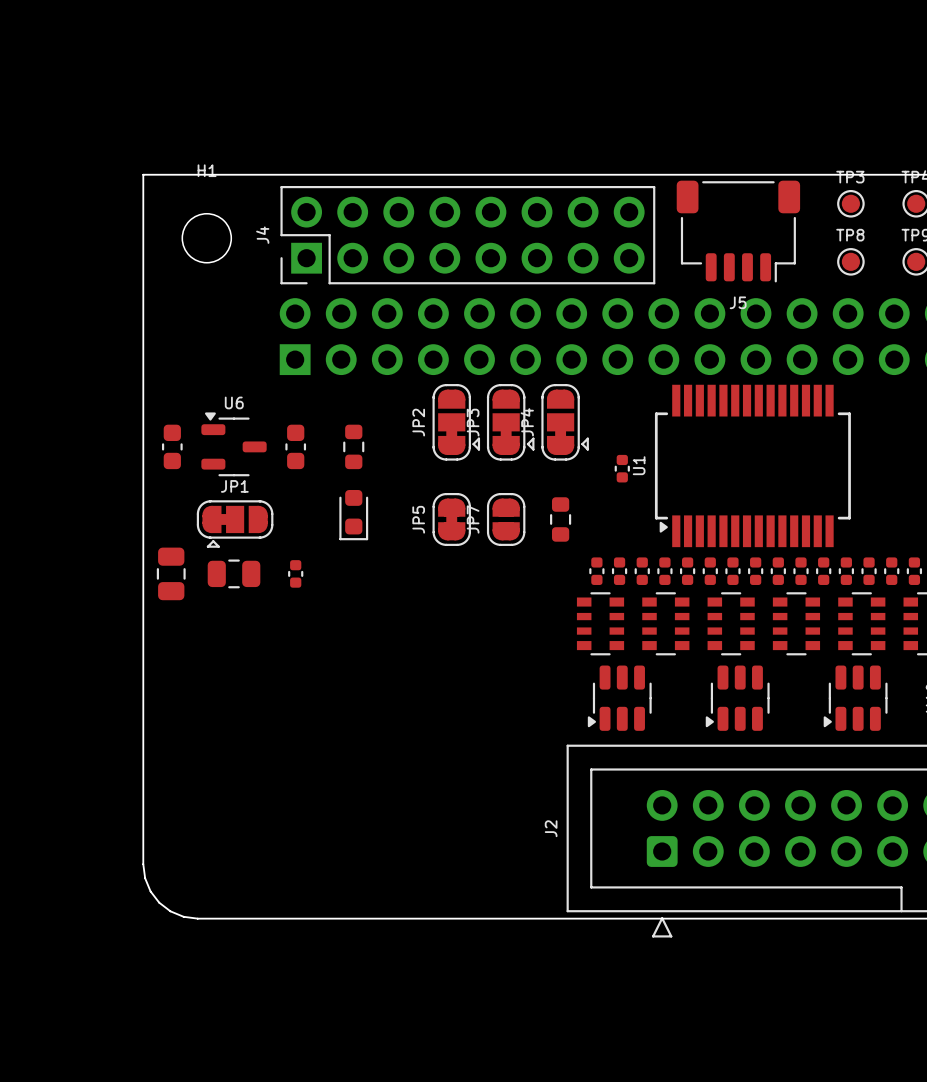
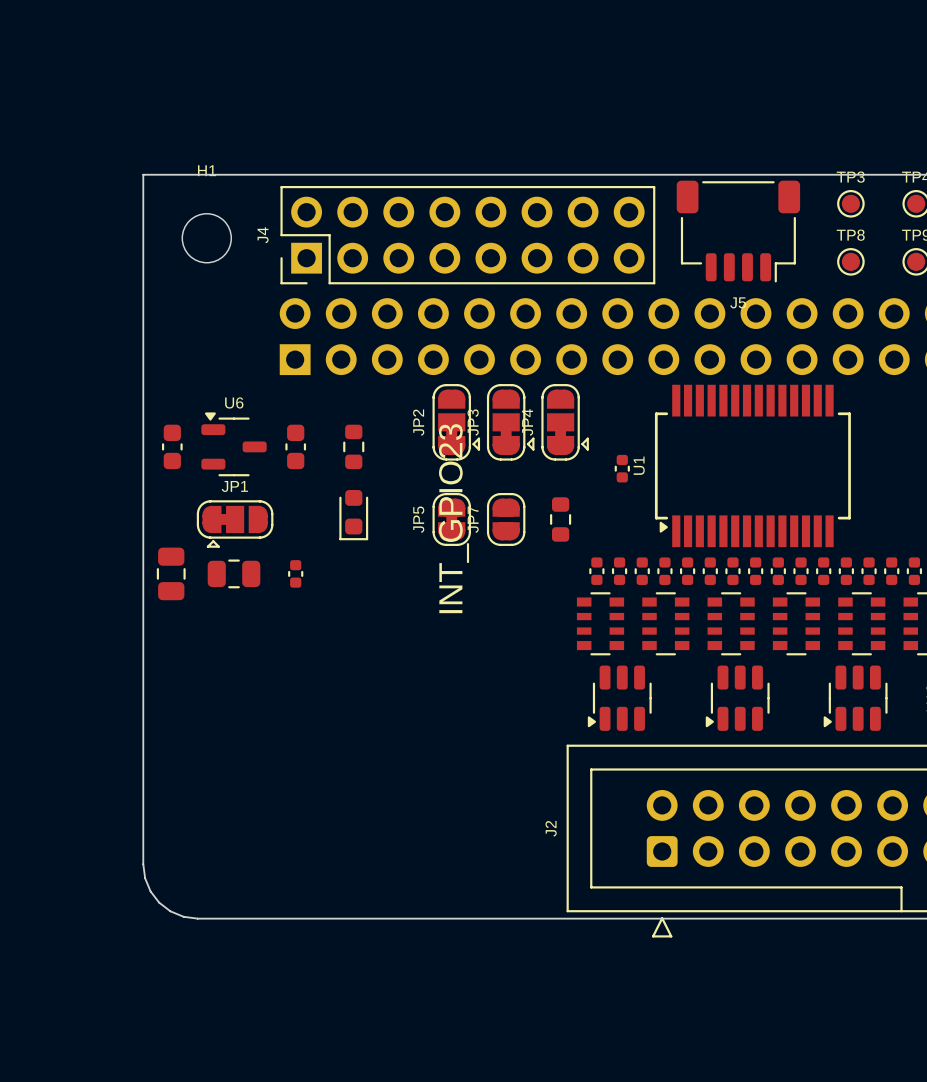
JP5 text: none -> INT_GPIO23 (454, 518)

